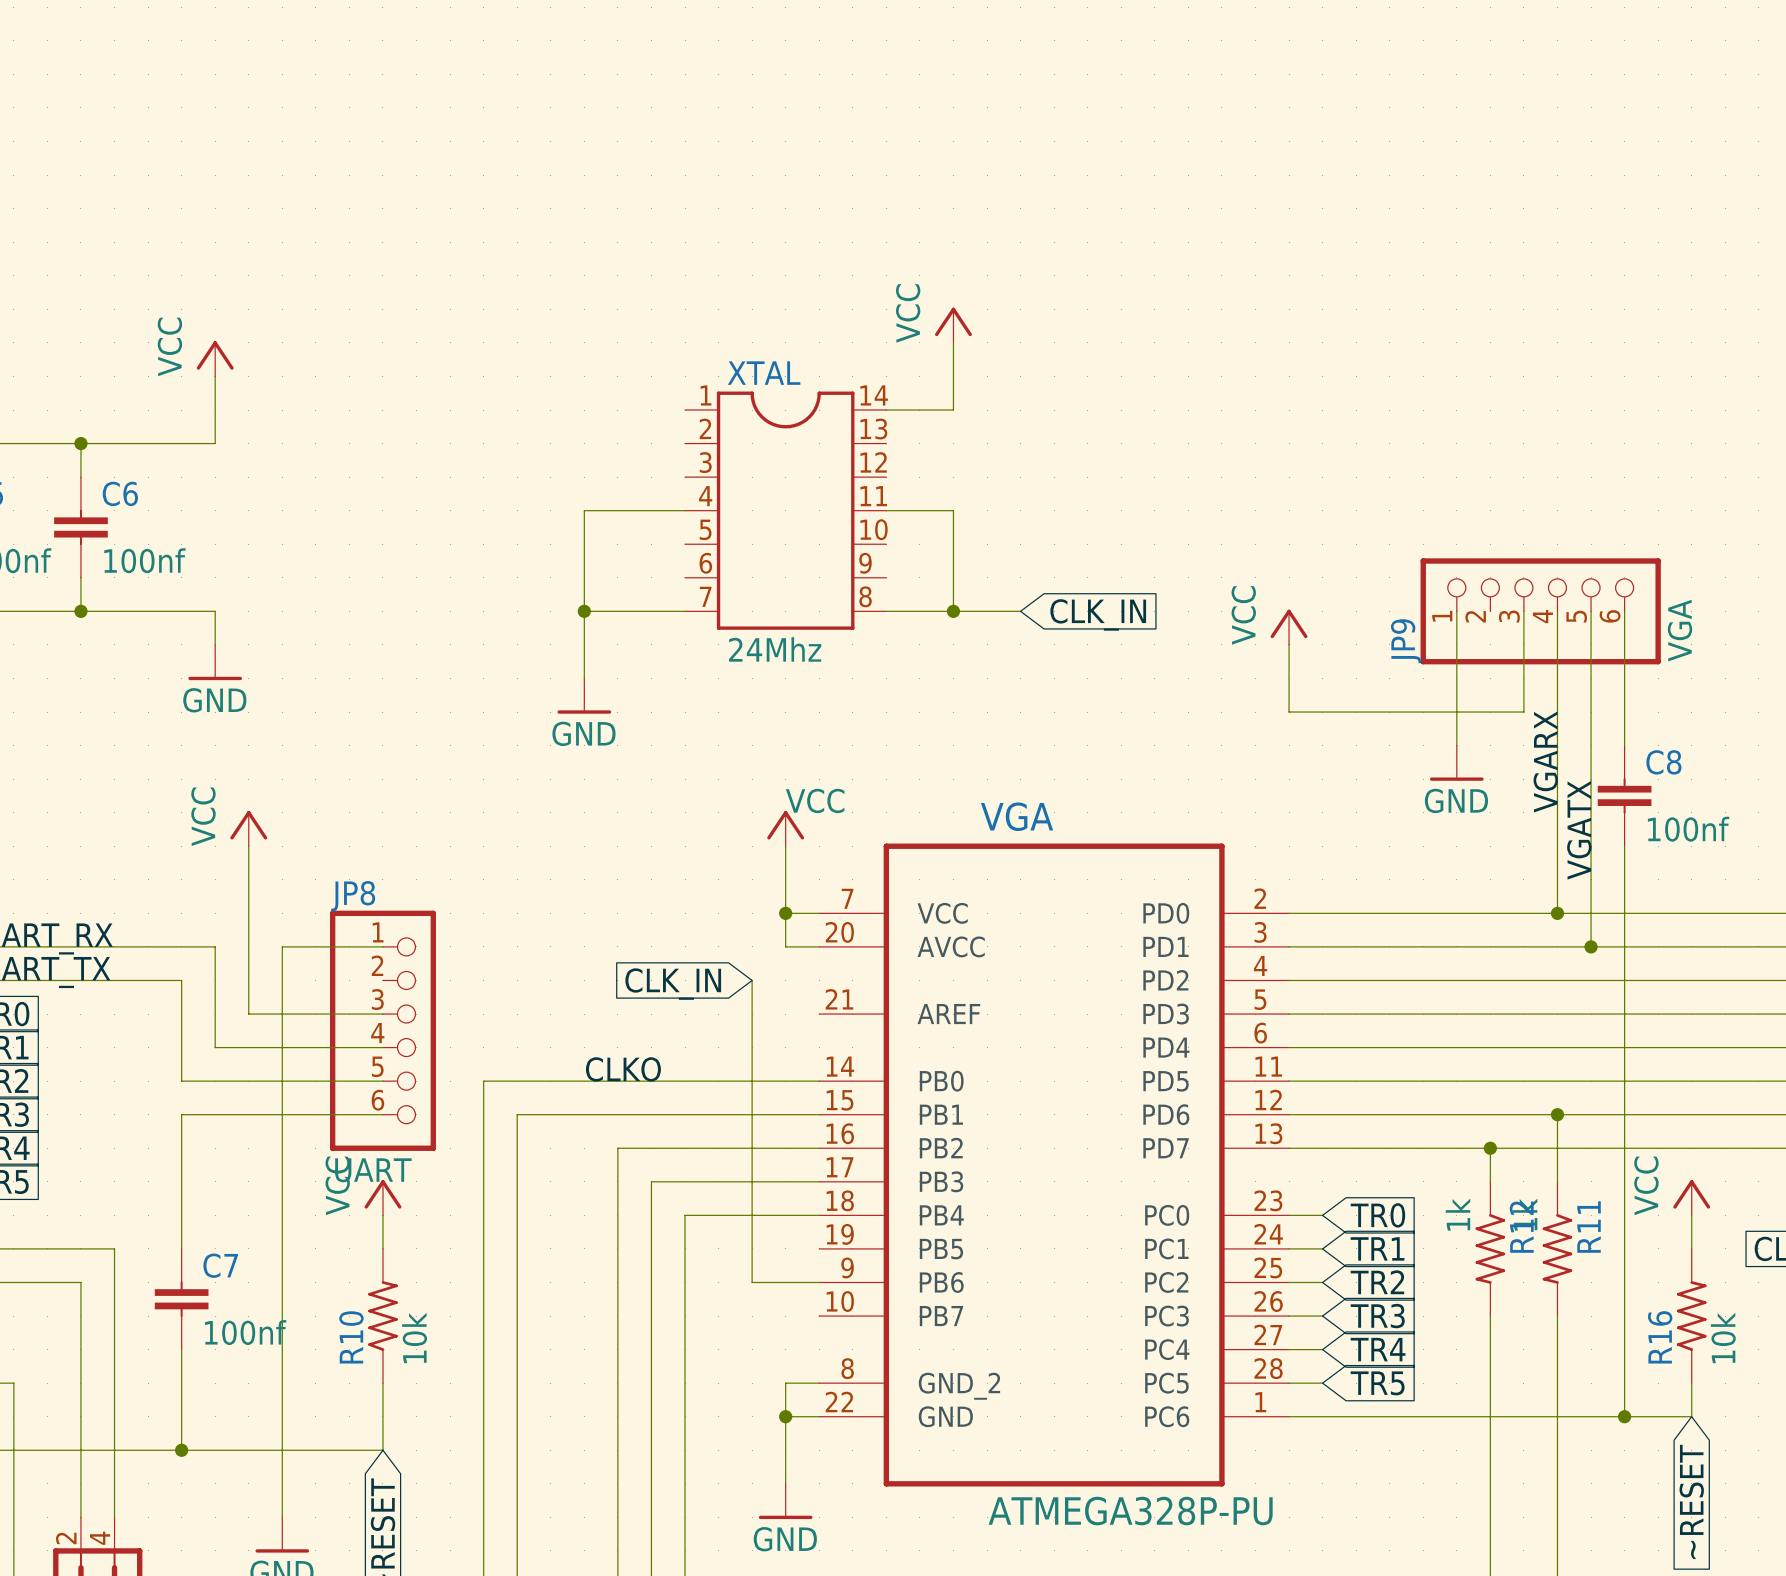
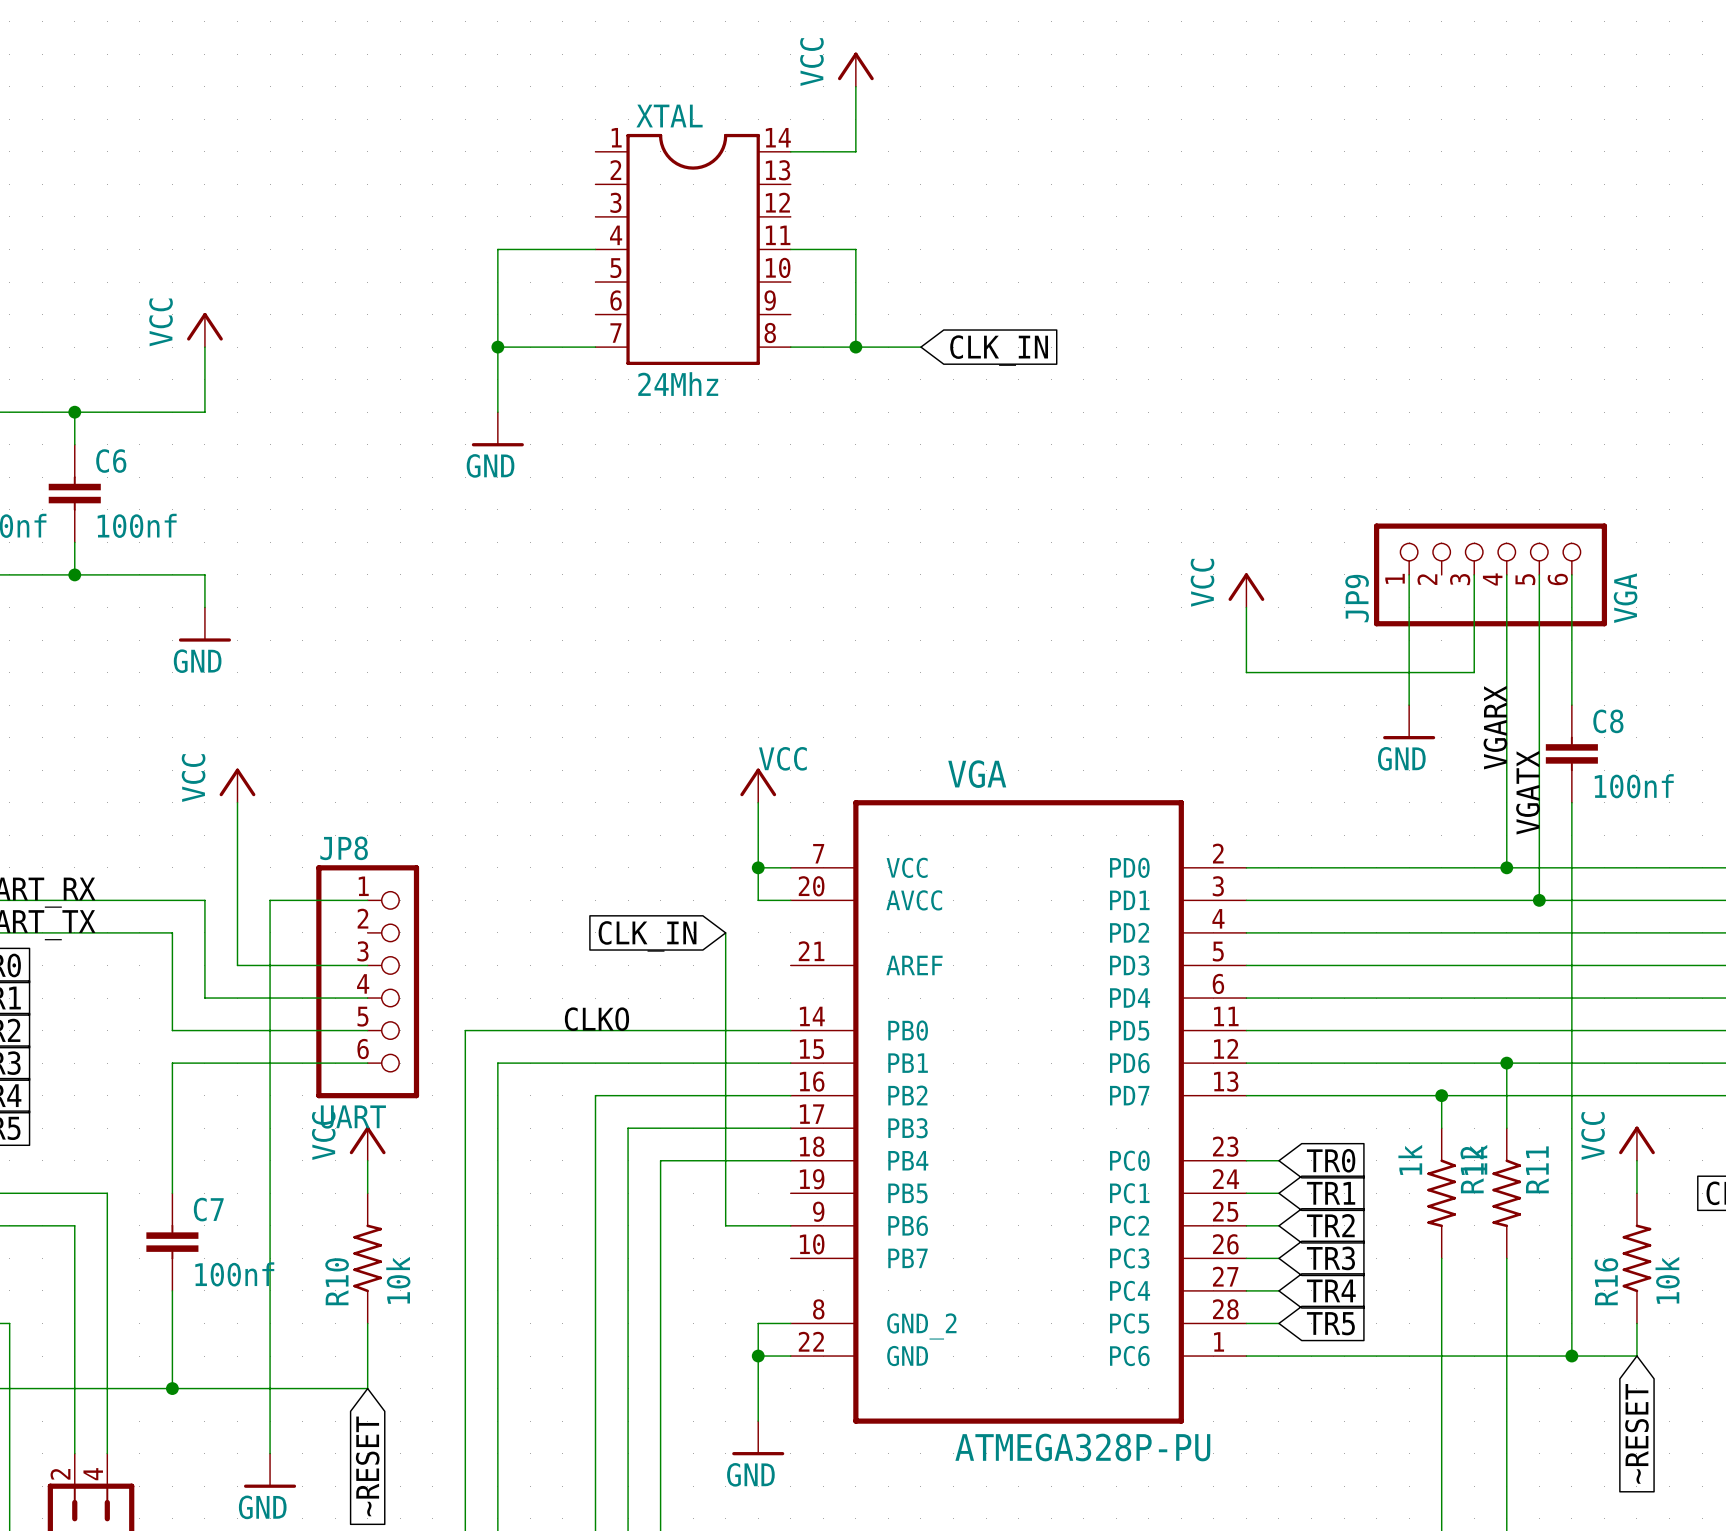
power symbol position: VCC (953, 325) -> VCC (855, 69)
wire: (953, 342) (953, 410) (886, 410) -> (855, 86) (855, 151) (790, 151)
junction: none -> (497, 347)
junction: none -> (855, 347)
wire: (685, 510) (584, 510) (584, 678) -> (595, 249) (497, 249) (497, 412)
XTAL position: (785, 510) -> (693, 249)
wire: (886, 510) (953, 510) (953, 611) -> (790, 249) (855, 249) (855, 347)
wire: (584, 611) (685, 611) -> (497, 347) (595, 347)
junction: (584, 611) -> none
wire: (886, 611) (1020, 611) -> (790, 347) (920, 347)
junction: (953, 611) -> none
global label position: CLK_IN (1098, 614) -> CLK_IN (999, 350)
power symbol position: GND (584, 696) -> GND (497, 429)

